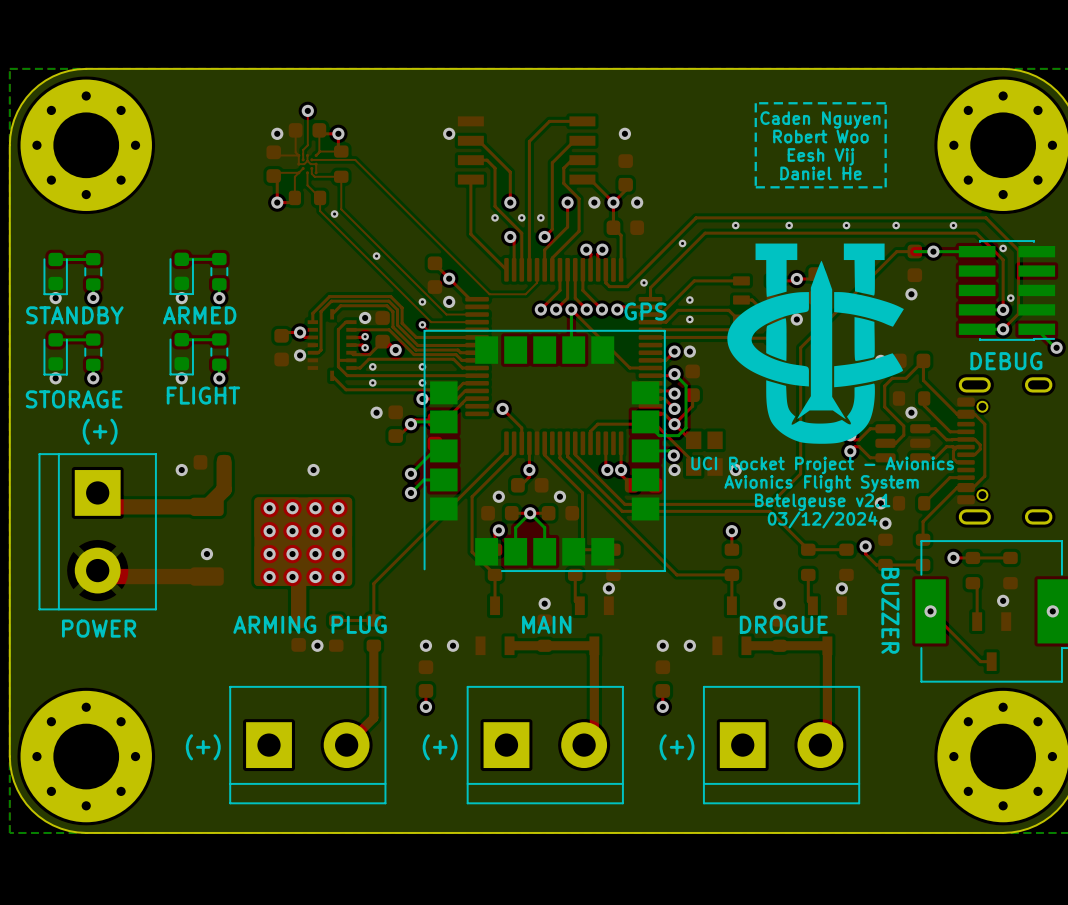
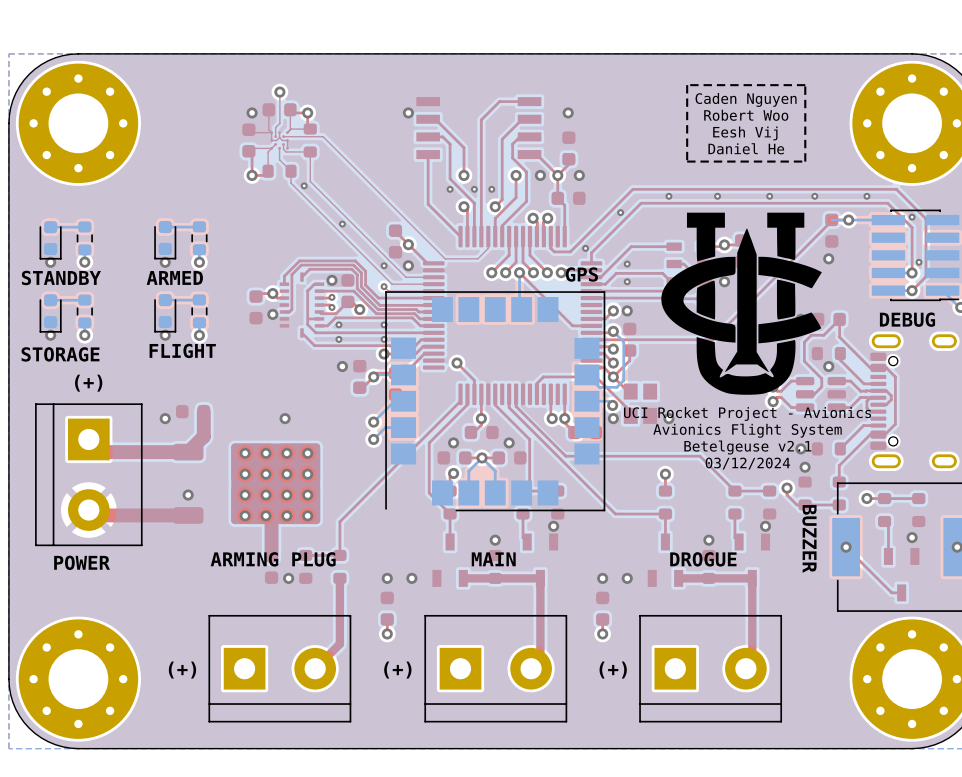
top track: (915, 251) (896, 251) (800, 347) (800, 473) (770, 504) (624, 504) (575, 454) (575, 443) -> (832, 220) (713, 339) (591, 339)

